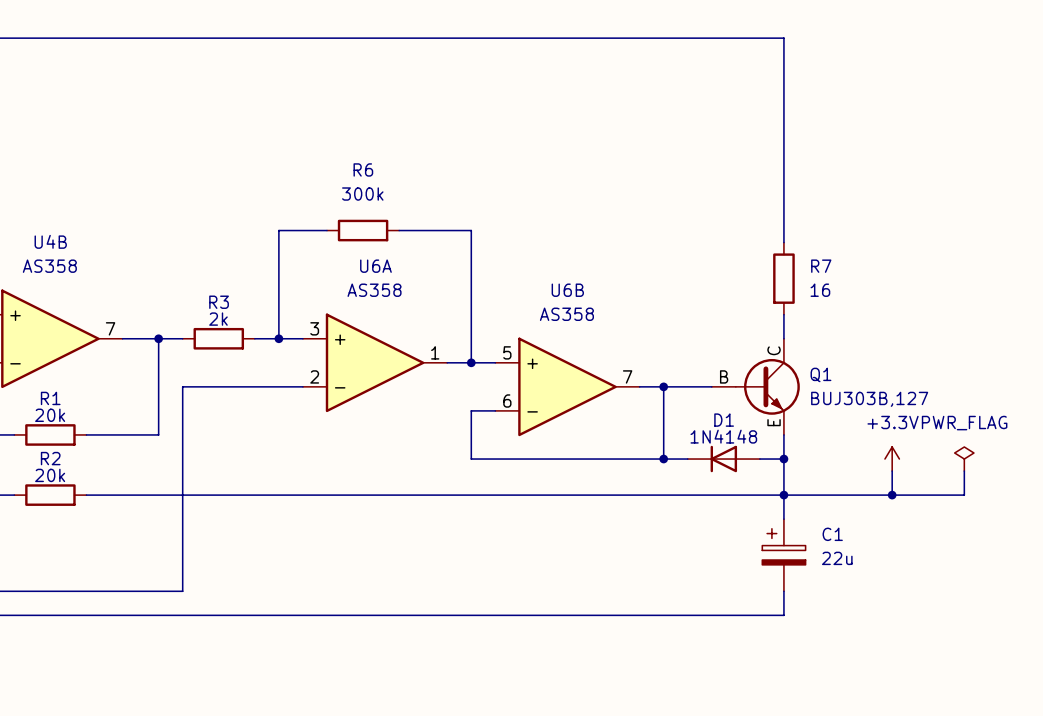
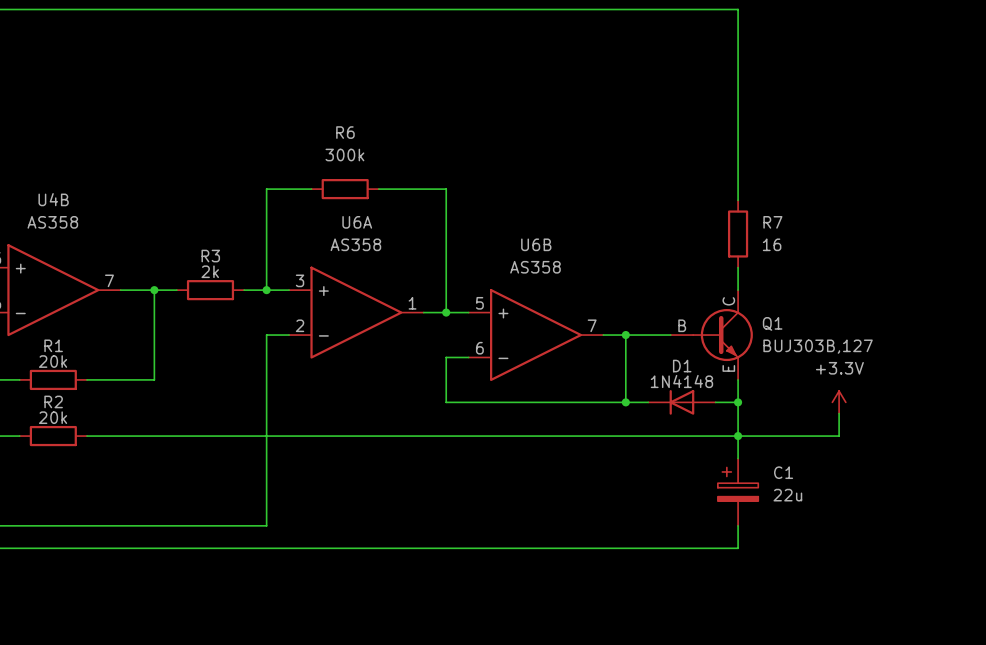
wire: (278, 386) (182, 386) (182, 591) -> (266, 335) (266, 525) (176, 525)
power symbol: PWR_FLAG (964, 459) -> none
wire: (964, 471) (964, 495) (892, 495) -> none
junction: (892, 495) -> none

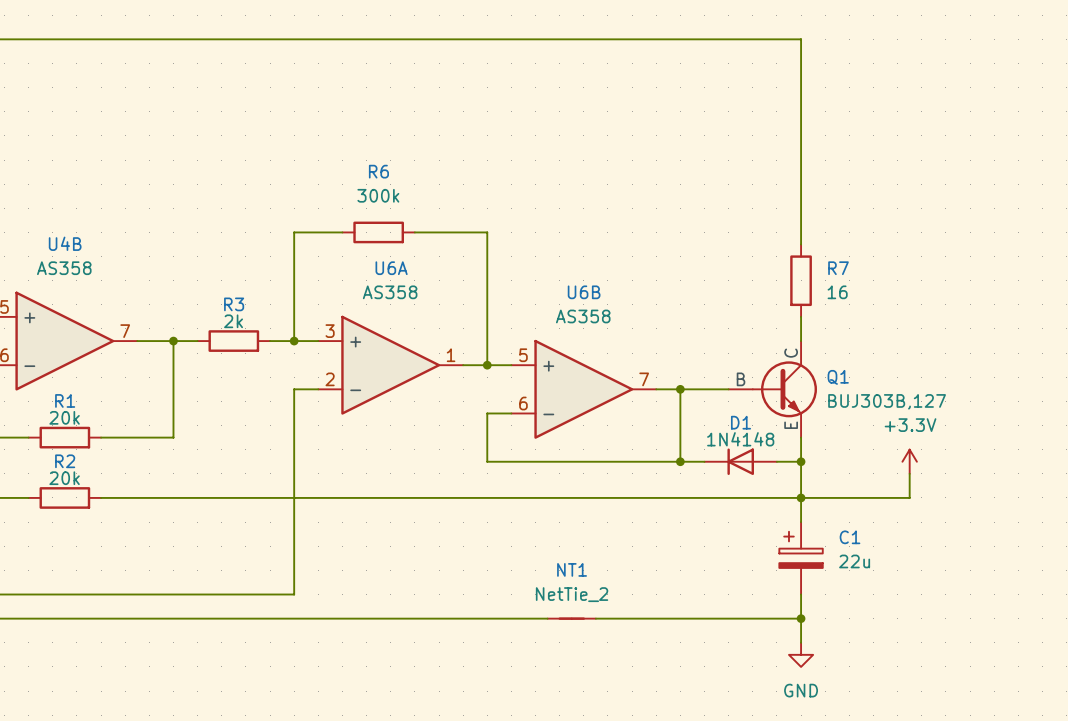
NT1: none -> NetTie_2 (571, 618)
wire: none -> (801, 618) (801, 642)
junction: none -> (801, 618)
power symbol: none -> GND (801, 654)

